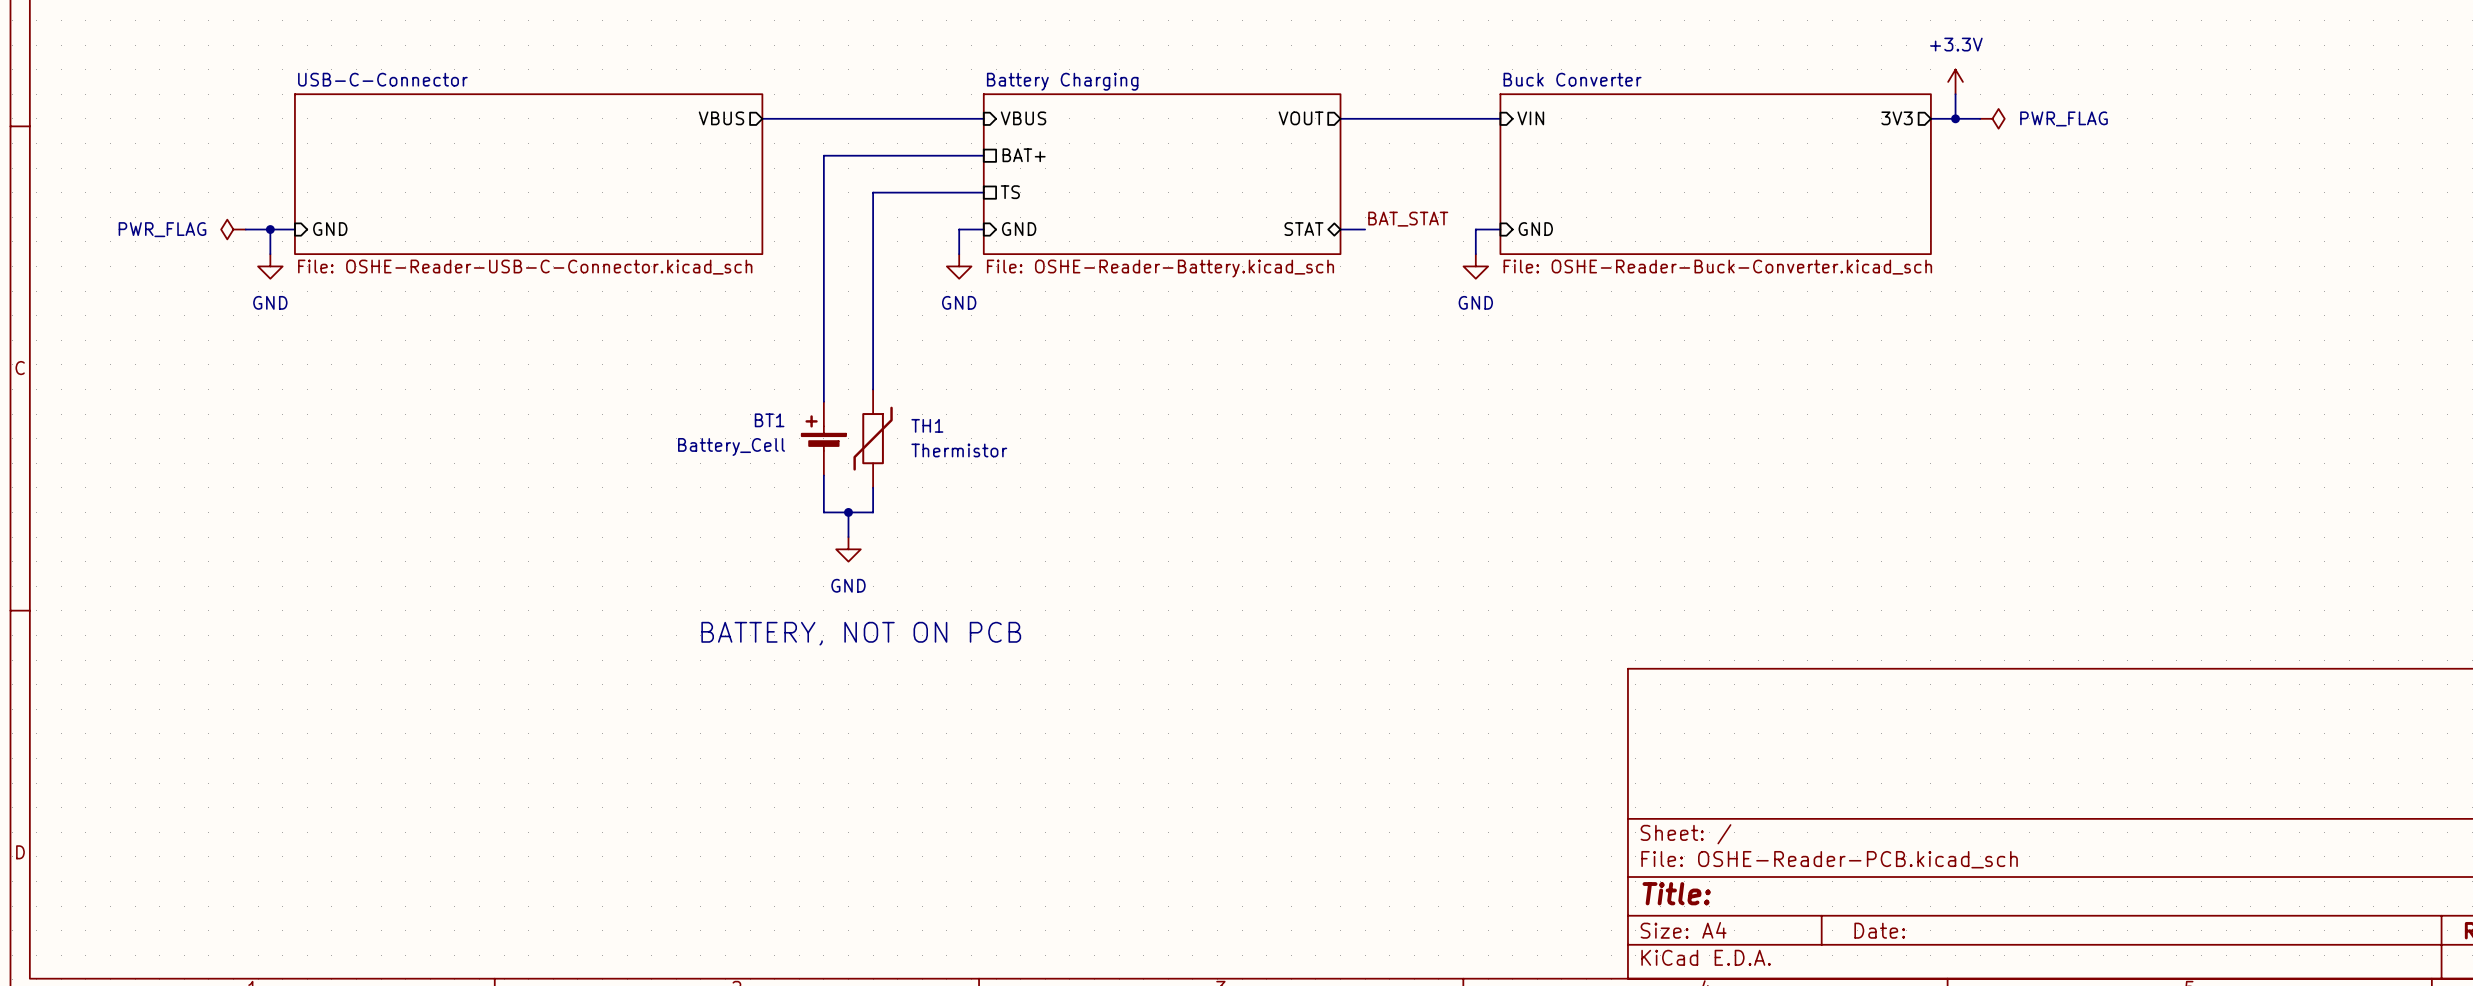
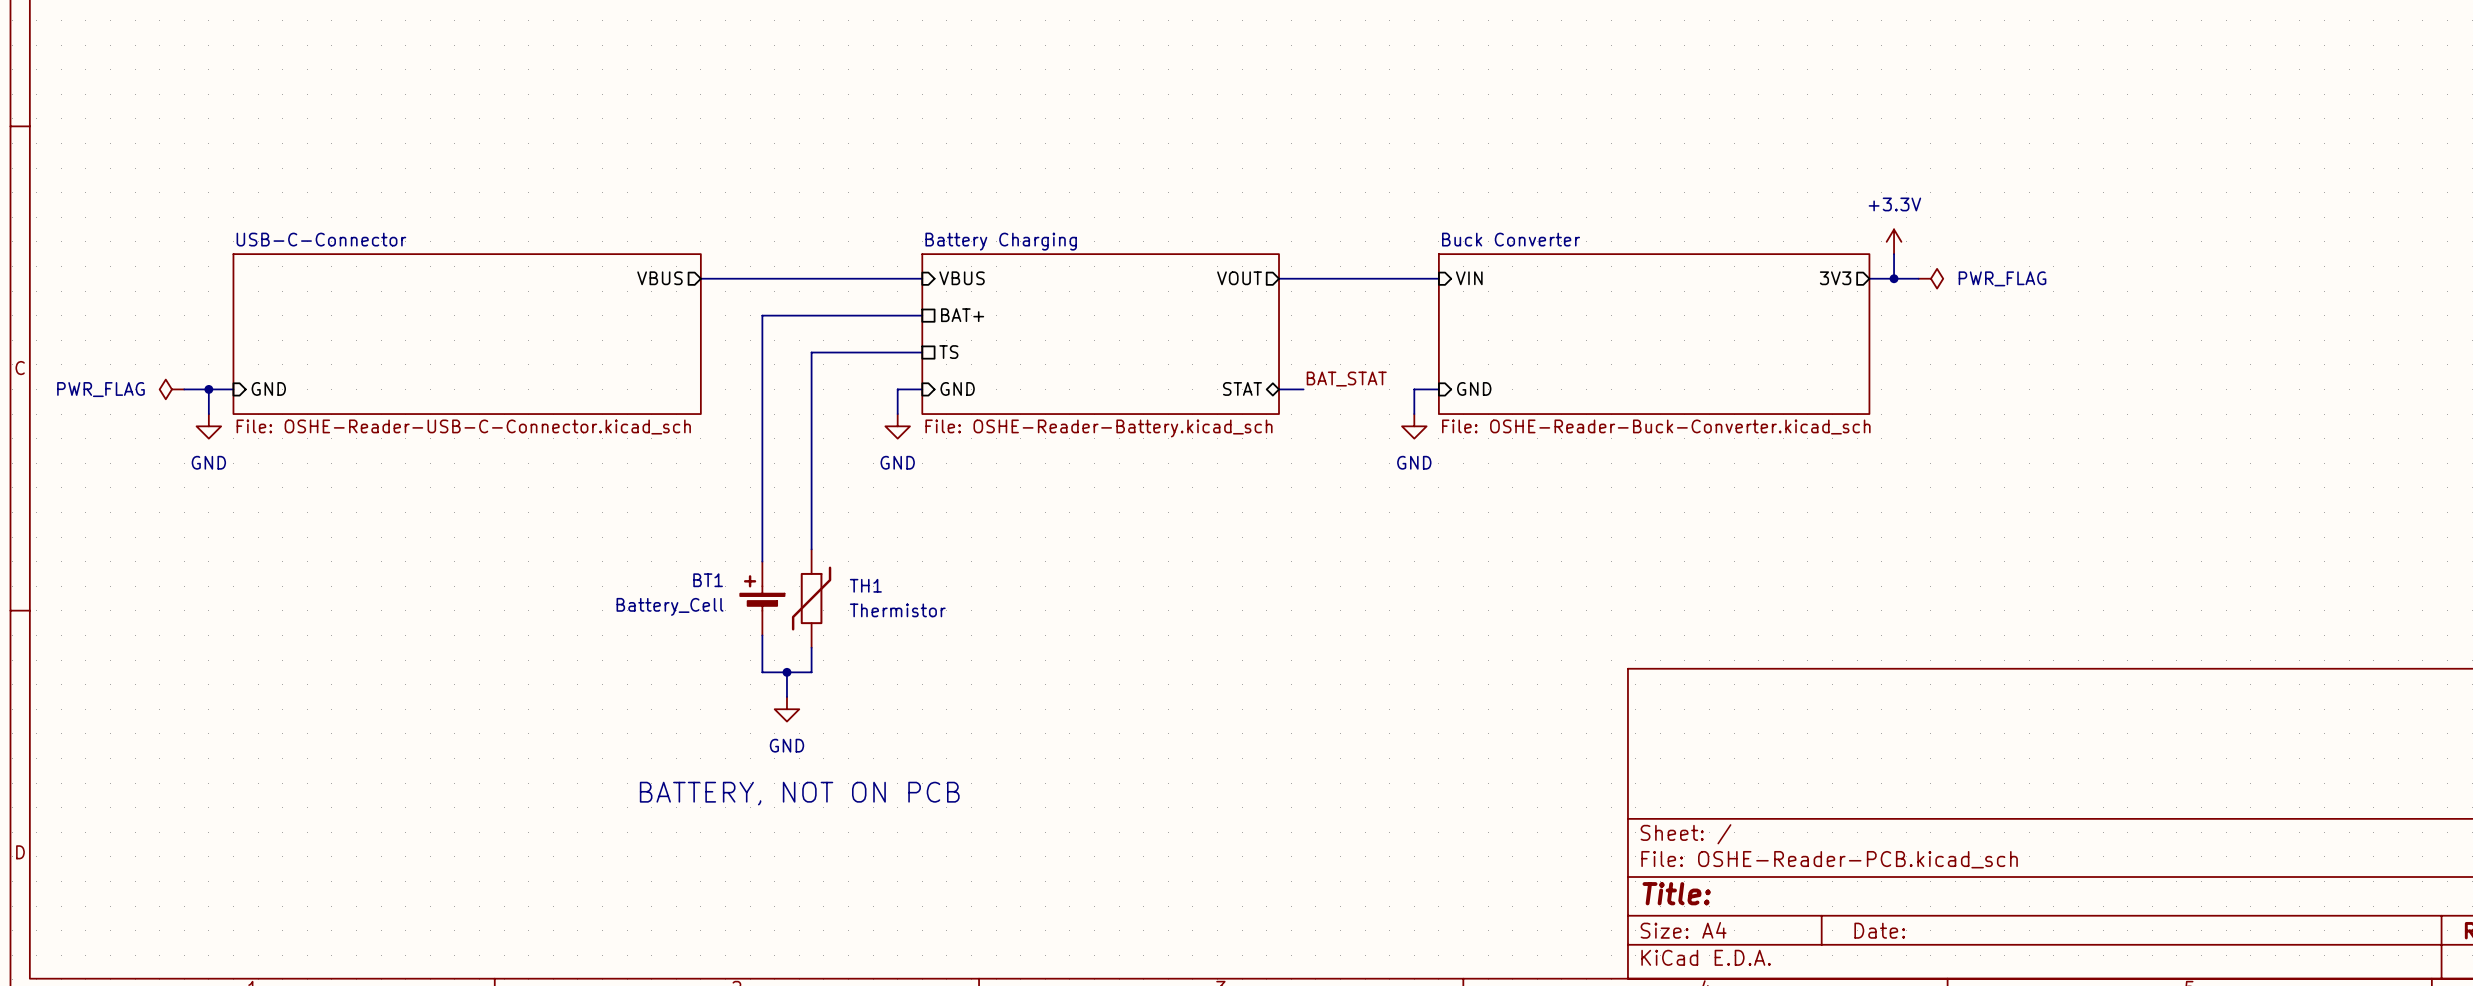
power symbol position: +3.3V (1955, 81) -> +3.3V (1894, 241)
wire: (1955, 94) (1955, 118) -> (1894, 254) (1894, 278)
sheet pin: VBUS (721, 118) -> none
wire: (762, 118) (983, 118) -> (700, 278) (922, 278)
sheet pin: VBUS (1023, 118) -> none
sheet pin position: VOUT (1301, 118) -> VOUT (1239, 278)
wire: (1340, 118) (1500, 118) -> (1279, 278) (1438, 278)
sheet pin position: VIN (1530, 118) -> VIN (1469, 278)
sheet pin position: 3V3 (1897, 118) -> 3V3 (1835, 278)
wire: (1930, 118) (1980, 118) -> (1869, 278) (1918, 278)
junction: (1955, 118) -> none
power symbol position: PWR_FLAG (1992, 118) -> PWR_FLAG (1930, 278)
wire: (983, 155) (823, 155) (823, 401) -> (922, 315) (762, 315) (762, 561)
sheet pin position: BAT+ (1024, 155) -> BAT+ (962, 315)
sheet USB-C-Connector position: (528, 174) -> (467, 334)
sheet Battery Charging position: (1162, 174) -> (1100, 334)
sheet Buck Converter position: (1715, 174) -> (1654, 334)
wire: (983, 192) (873, 192) (873, 389) -> (922, 352) (811, 352) (811, 549)
sheet pin position: TS (1010, 192) -> TS (948, 352)
label position: BAT_STAT (1408, 219) -> BAT_STAT (1346, 379)
power symbol position: PWR_FLAG (233, 229) -> PWR_FLAG (171, 389)
wire: (245, 229) (294, 229) -> (184, 389) (233, 389)
wire: (270, 229) (270, 254) -> (208, 389) (208, 414)
junction: (270, 229) -> none
sheet pin position: GND (330, 229) -> GND (268, 388)
wire: (983, 229) (959, 229) (959, 254) -> (922, 389) (897, 389) (897, 414)
sheet pin position: GND (1019, 229) -> GND (957, 388)
sheet pin position: STAT (1304, 229) -> STAT (1242, 388)
wire: (1340, 229) (1365, 229) -> (1279, 389) (1303, 389)
wire: (1500, 229) (1475, 229) (1475, 254) -> (1438, 389) (1414, 389) (1414, 414)
sheet pin position: GND (1535, 229) -> GND (1474, 388)
power symbol position: GND (270, 266) -> GND (208, 426)
power symbol: GND (959, 266) -> none
power symbol position: GND (1475, 266) -> GND (1414, 426)
sheet pin: none -> VBUS (659, 278)
sheet pin: none -> VBUS (962, 278)
junction: none -> (1894, 278)
junction: none -> (208, 389)
power symbol: none -> GND (897, 426)
BT1 position: (823, 438) -> (762, 598)
TH1 position: (873, 438) -> (811, 598)
wire: (823, 475) (823, 512) (873, 512) (873, 487) -> (762, 635) (762, 672) (811, 672) (811, 647)
wire: (848, 512) (848, 537) -> (786, 672) (786, 696)
junction: (848, 512) -> none
power symbol: GND (848, 549) -> none
text position: BATTERY, NOT ON PCB (861, 633) -> BATTERY, NOT ON PCB (799, 793)
junction: none -> (786, 672)
power symbol: none -> GND (786, 709)

